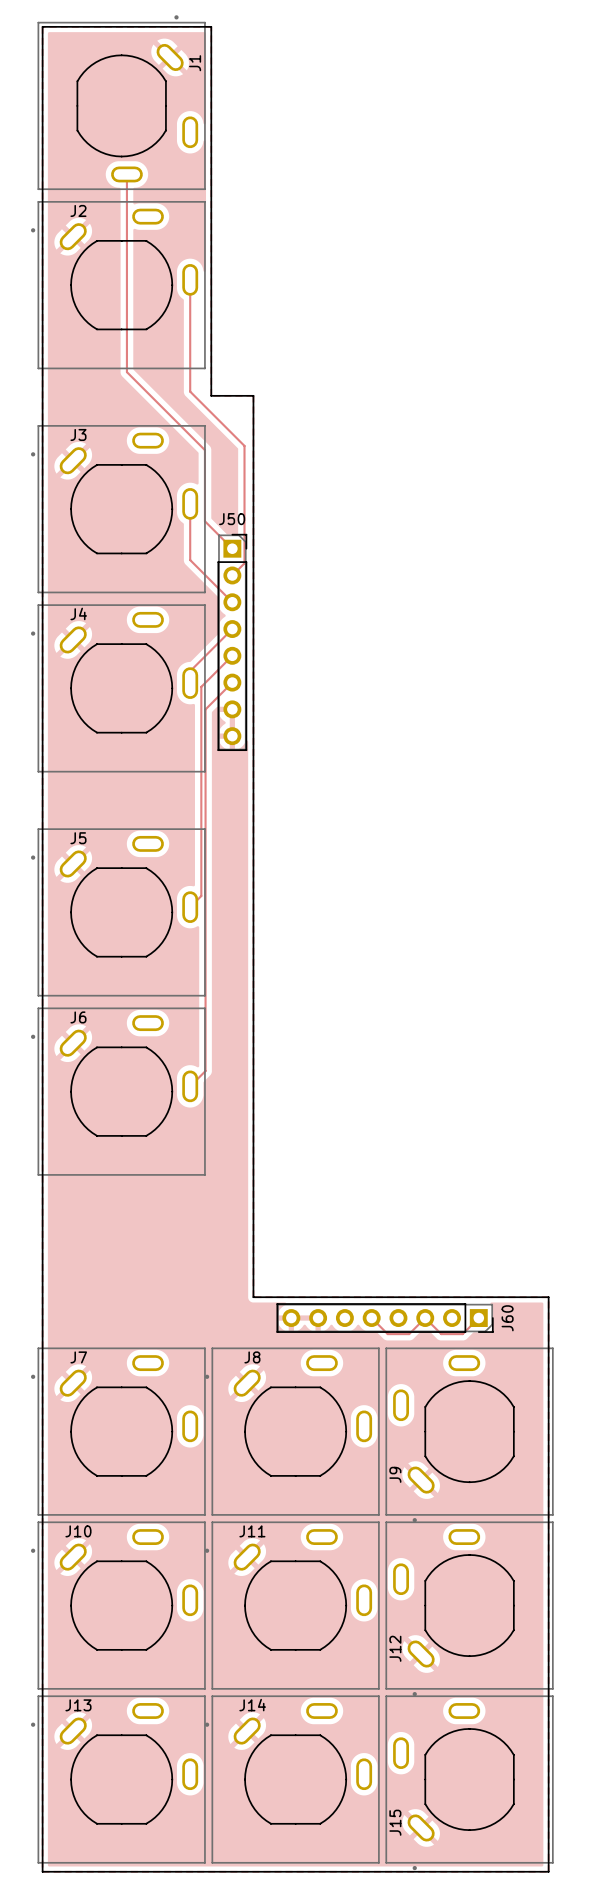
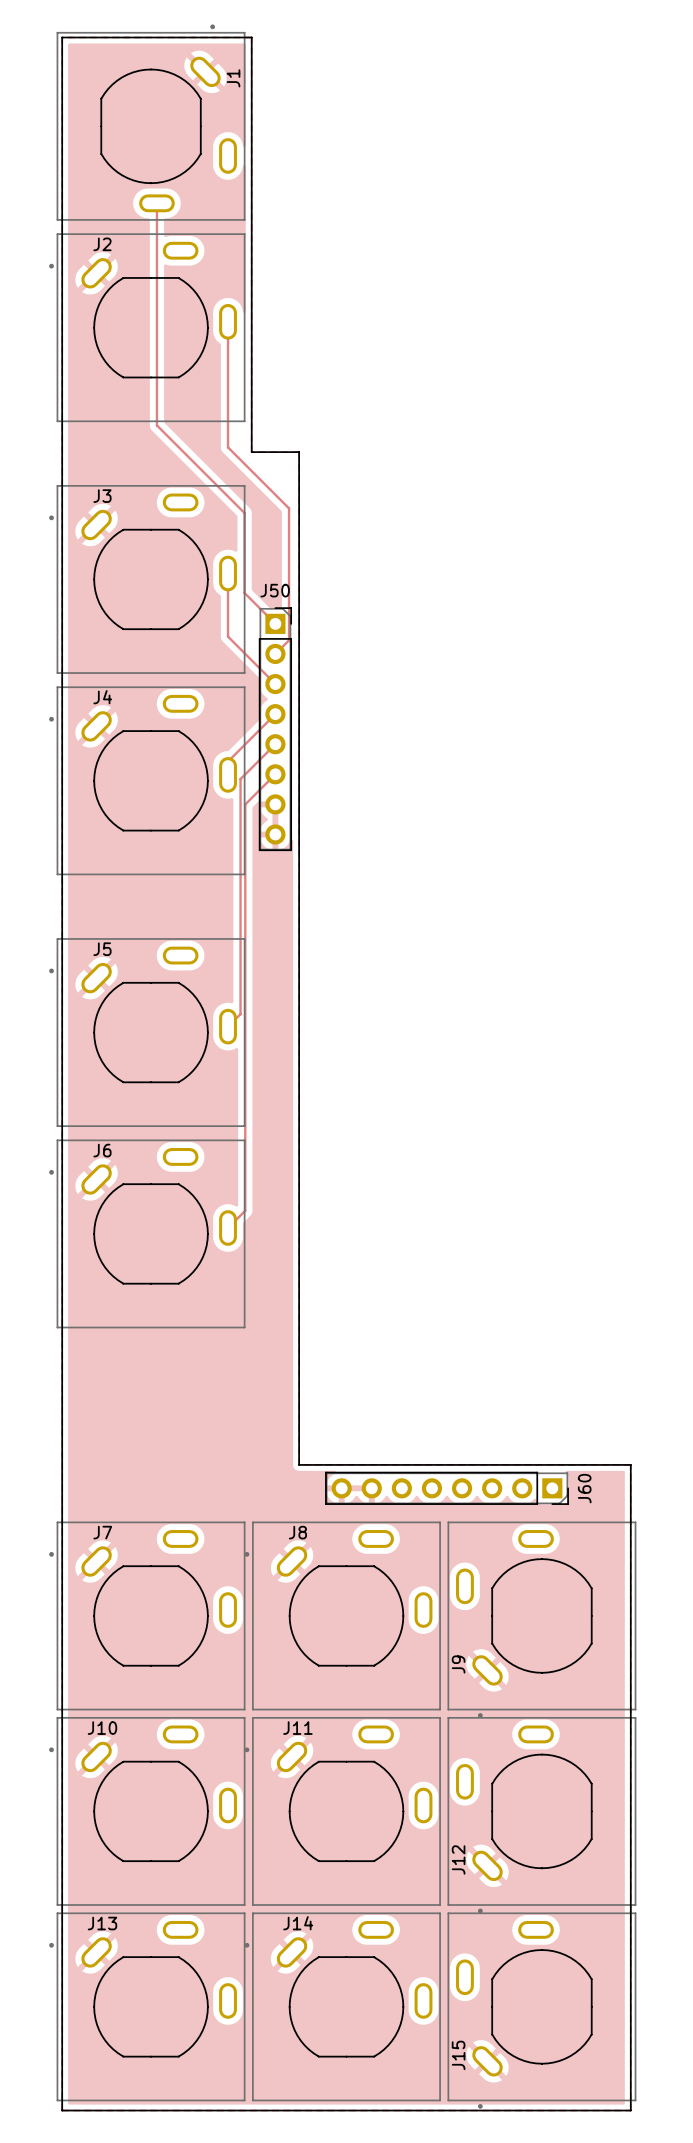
track: (371, 1318) (387, 1334) (409, 1334) (425, 1318) (441, 1334) (462, 1334) (478, 1318) -> none

